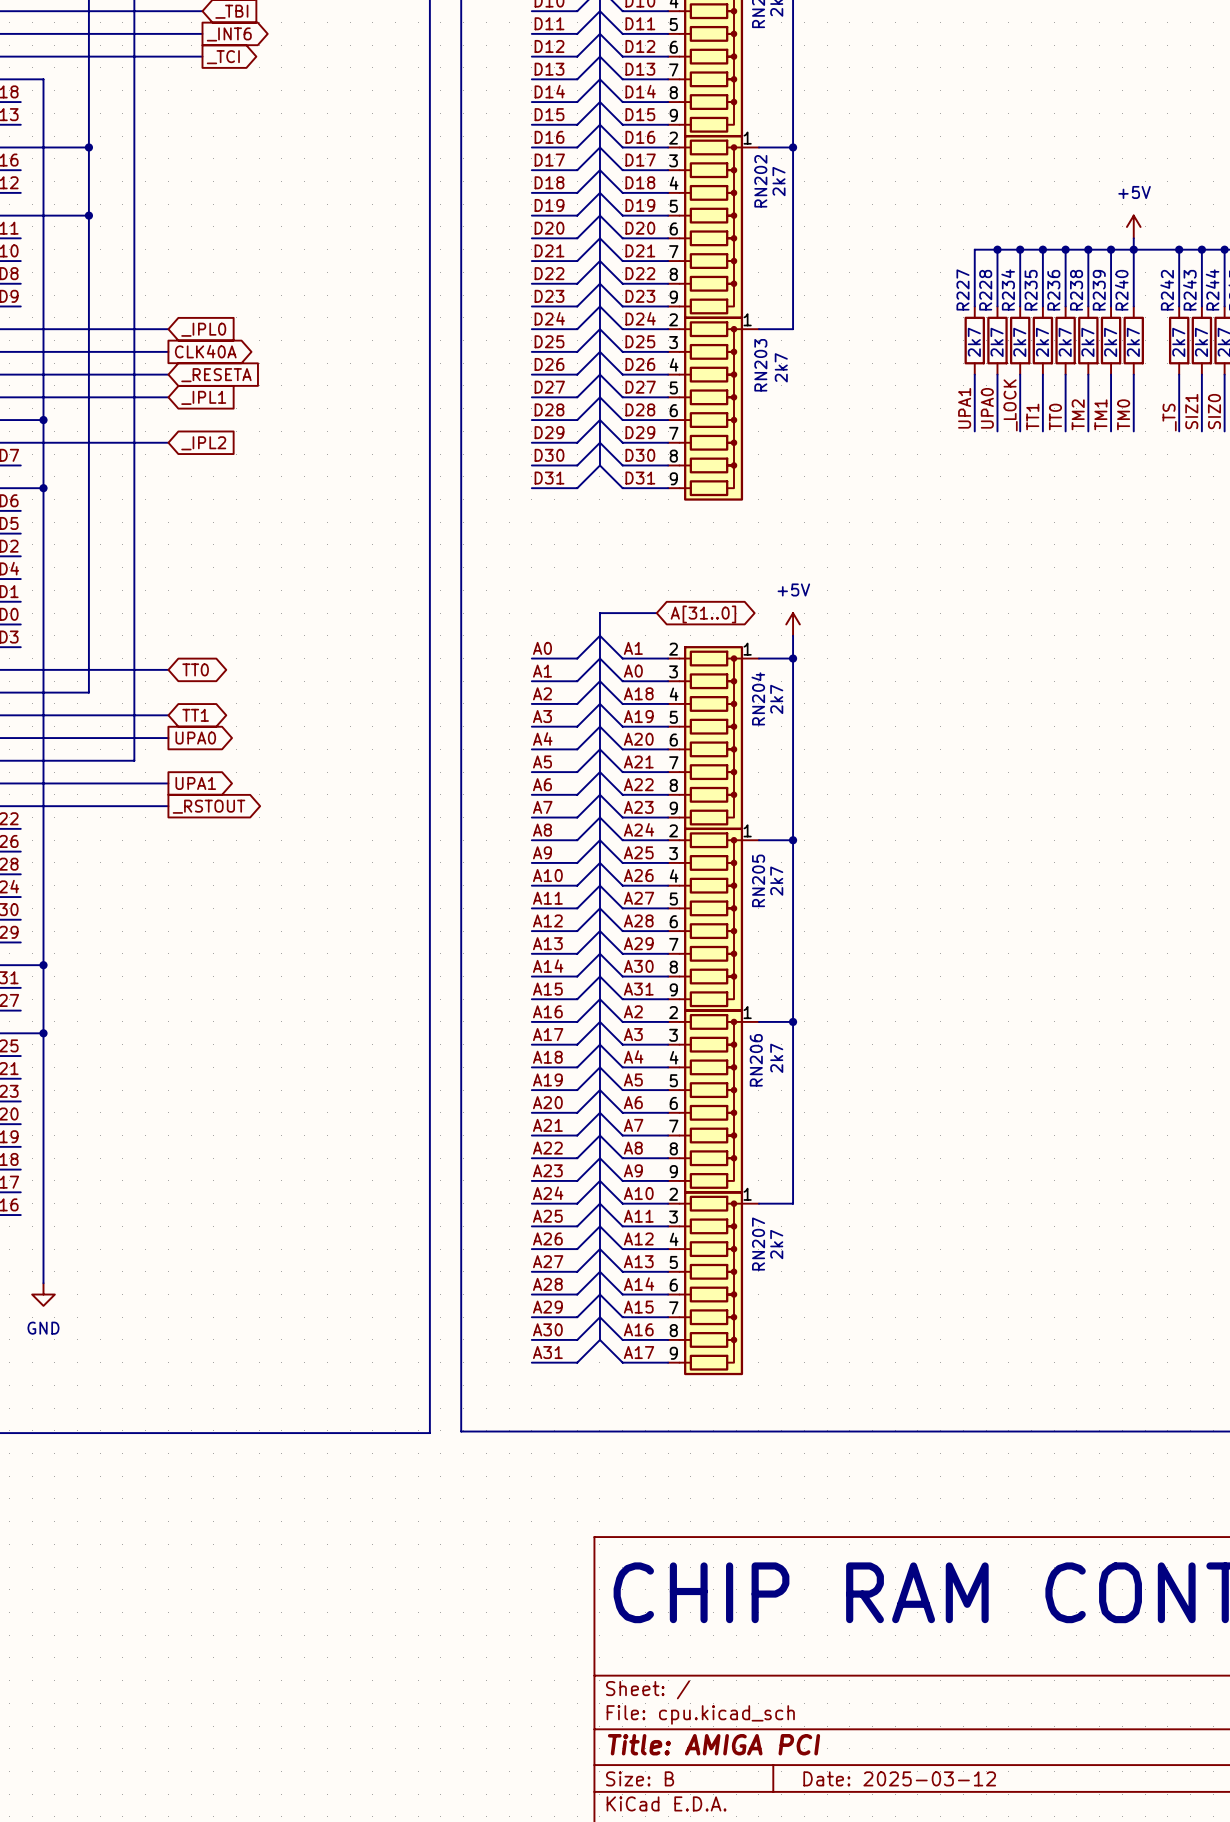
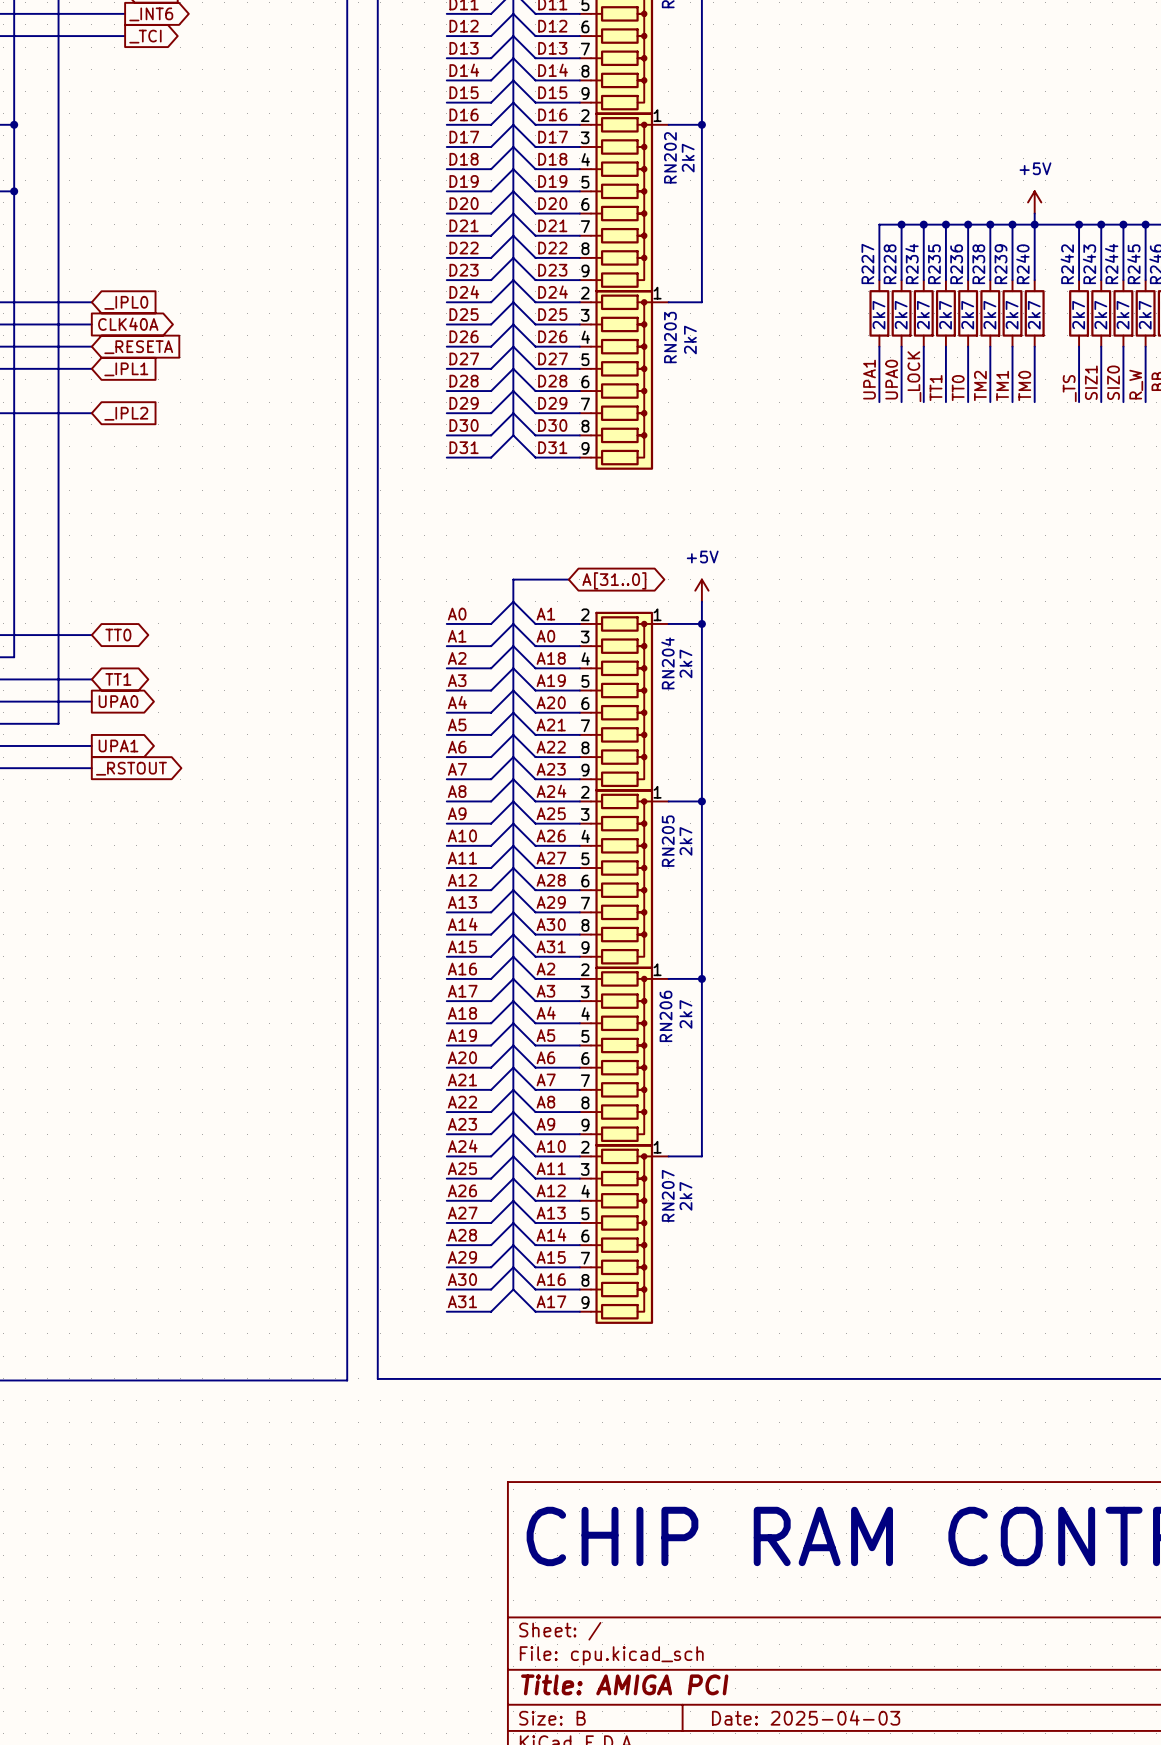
title block: Date: 2025-03-12 (899, 1778) -> Date: 2025-04-03 (806, 1717)

